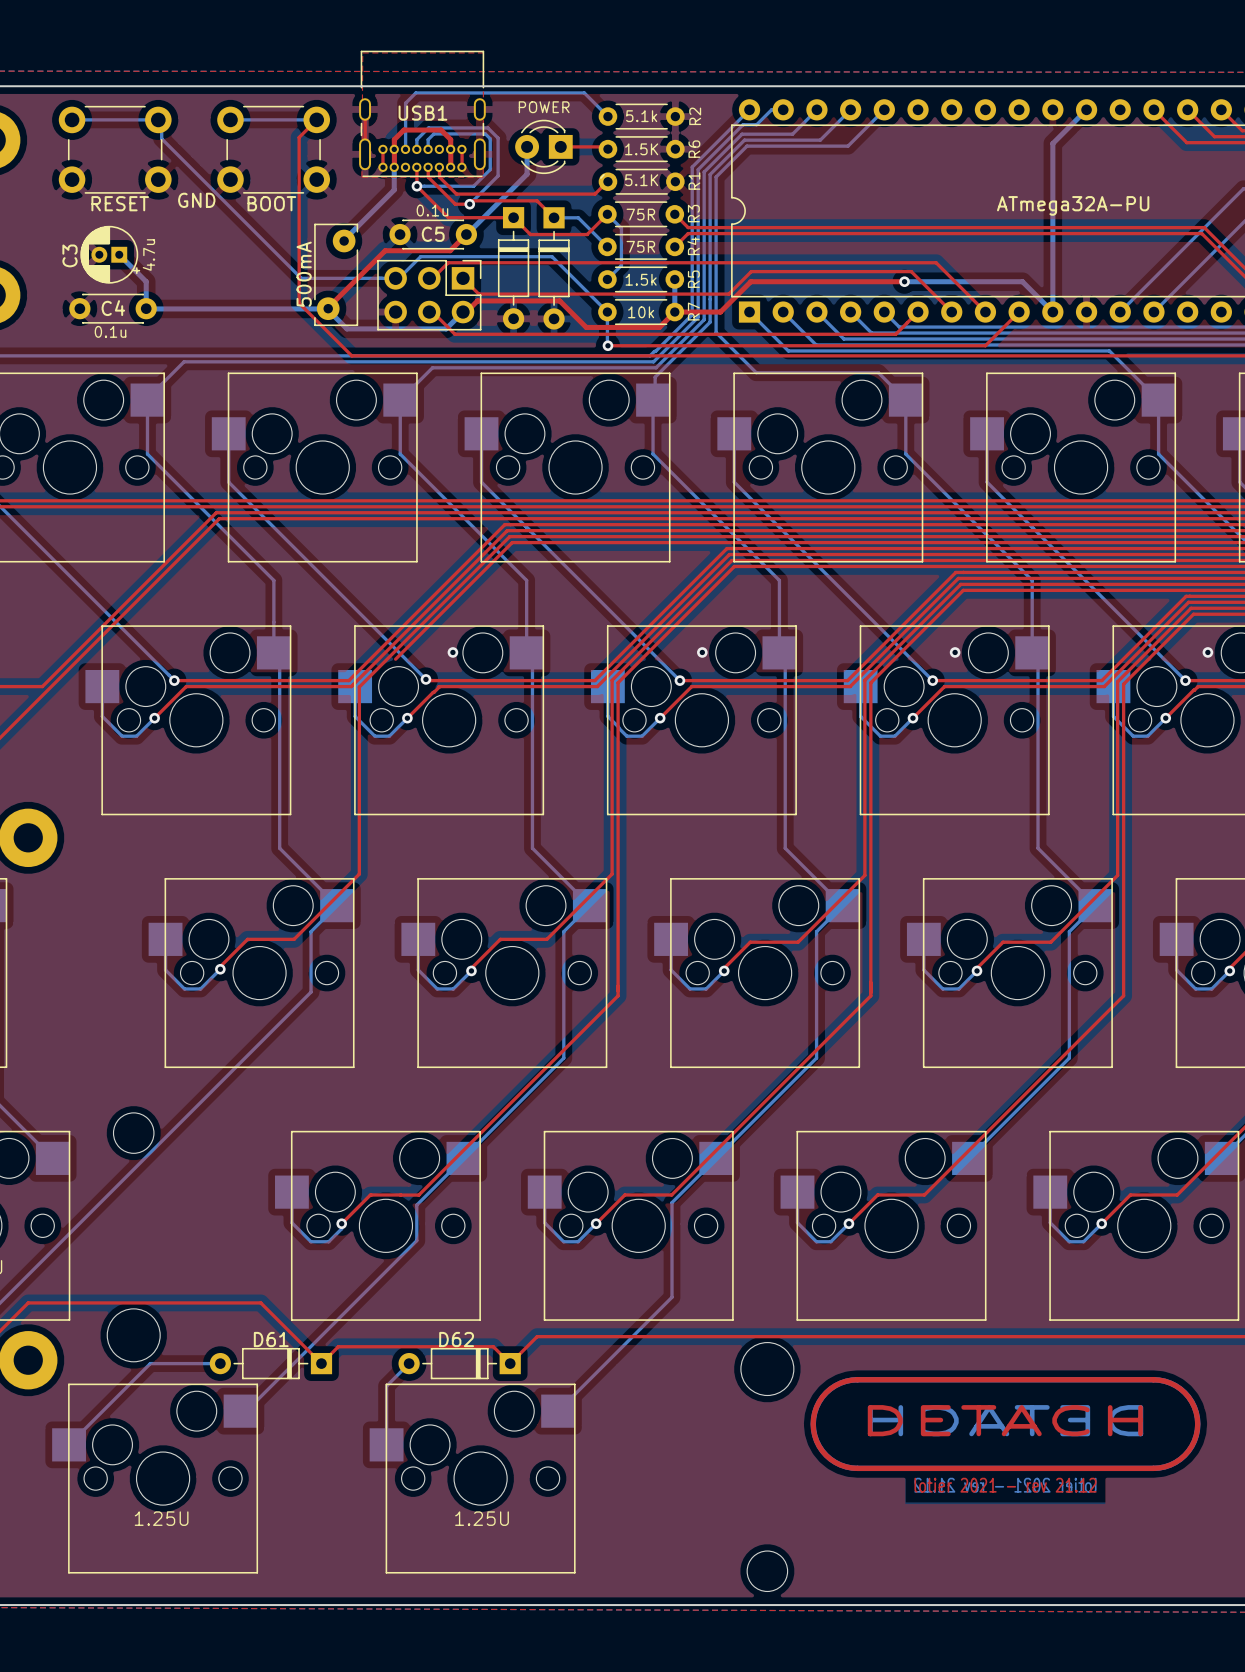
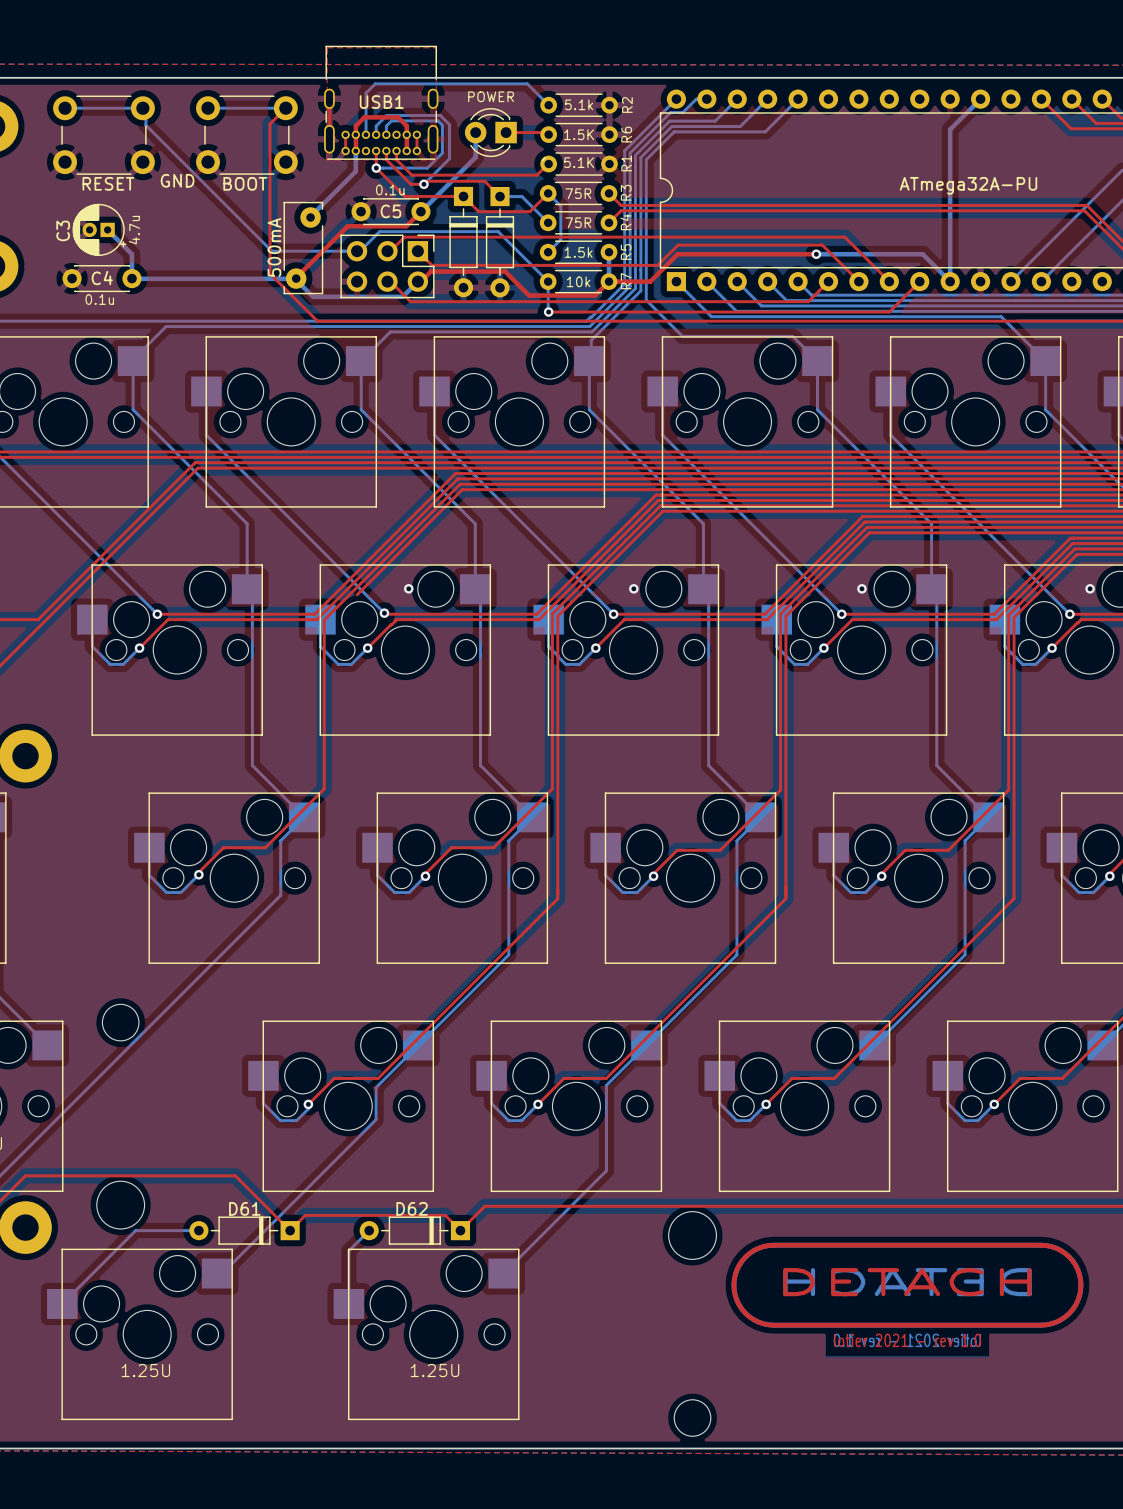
drawing: [810, 1377, 1201, 1472] -> none
drawing: none -> [731, 1242, 1084, 1328]

